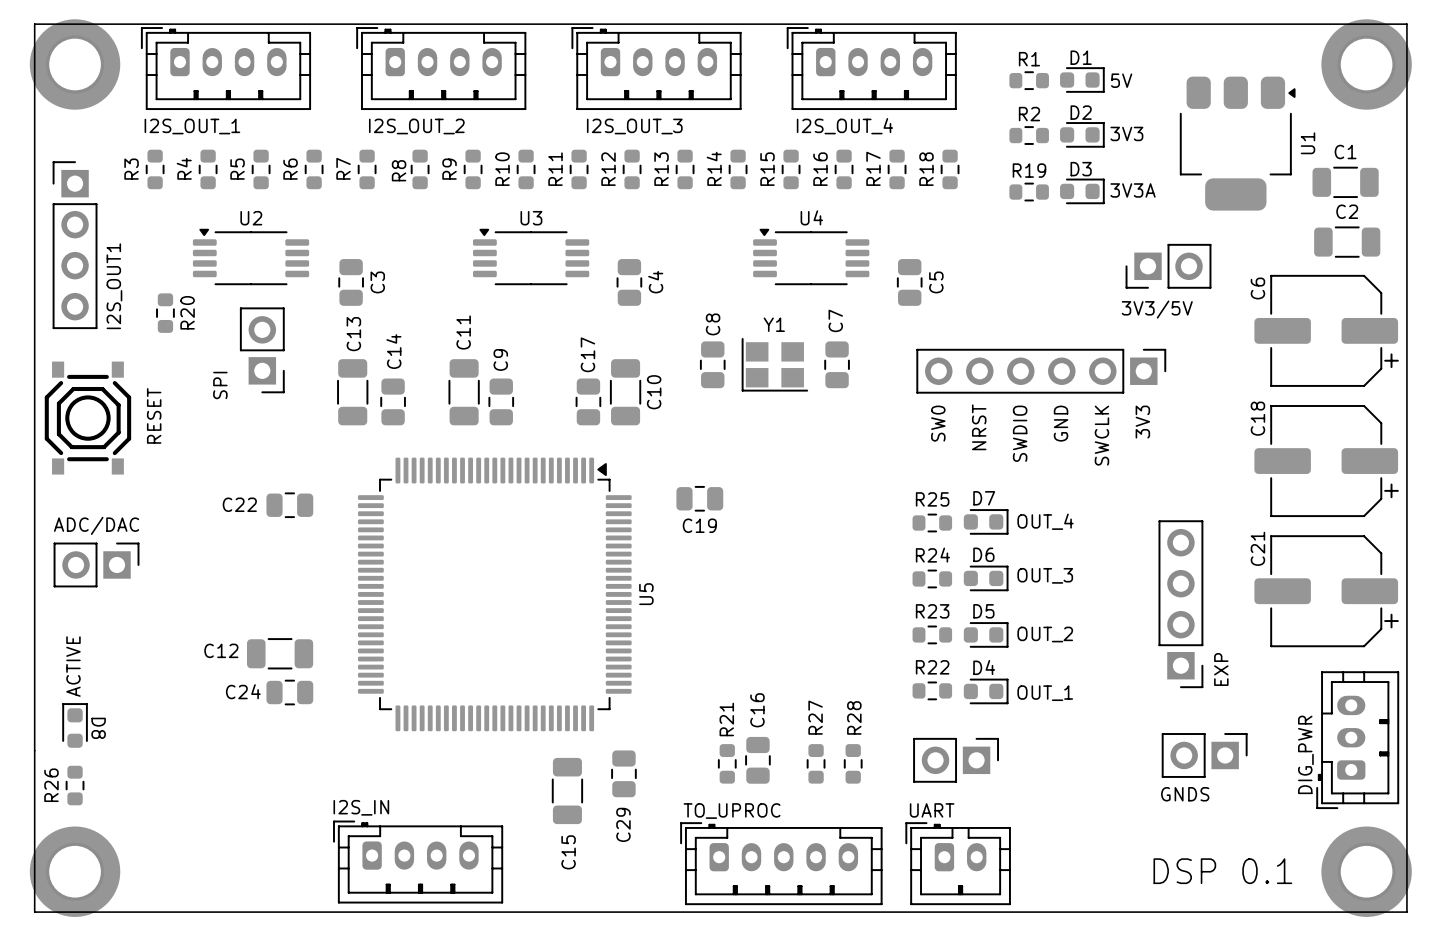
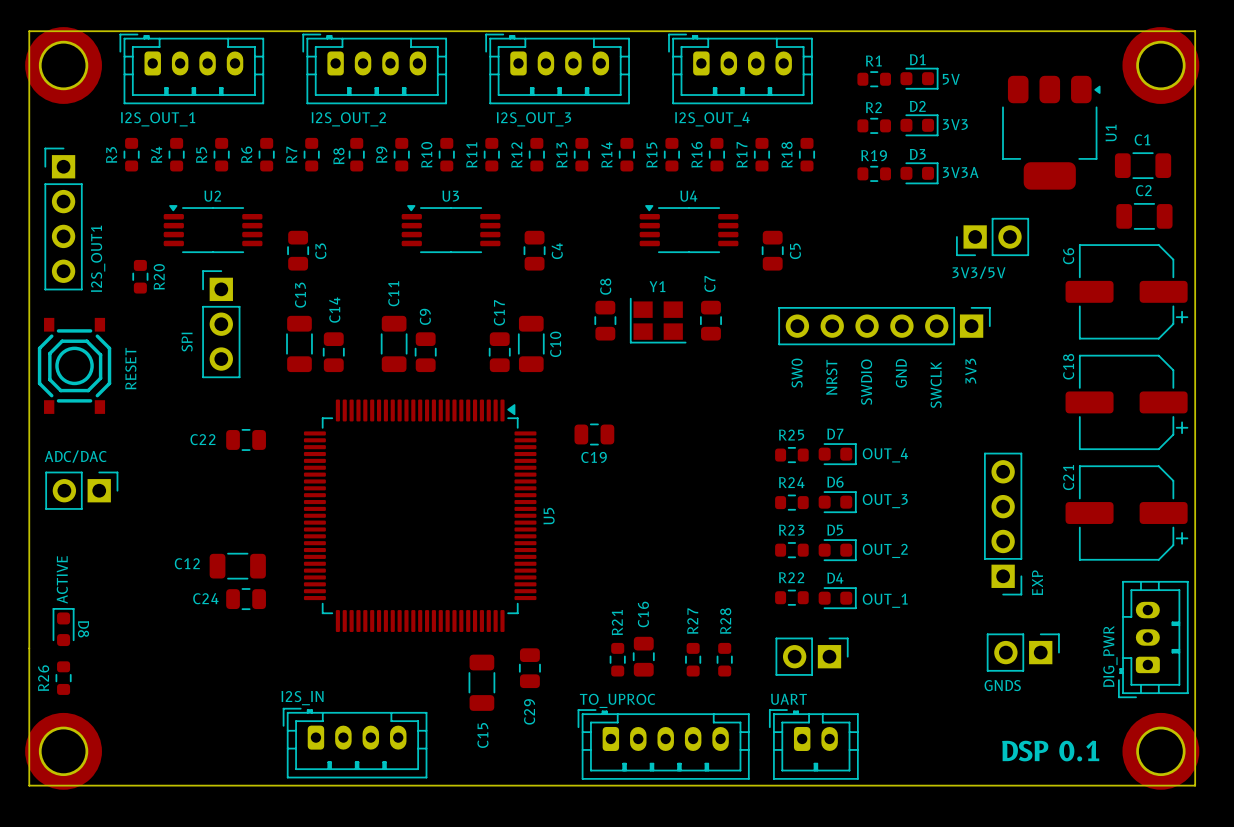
part: (262, 350) -> none
part: none -> (221, 324)

